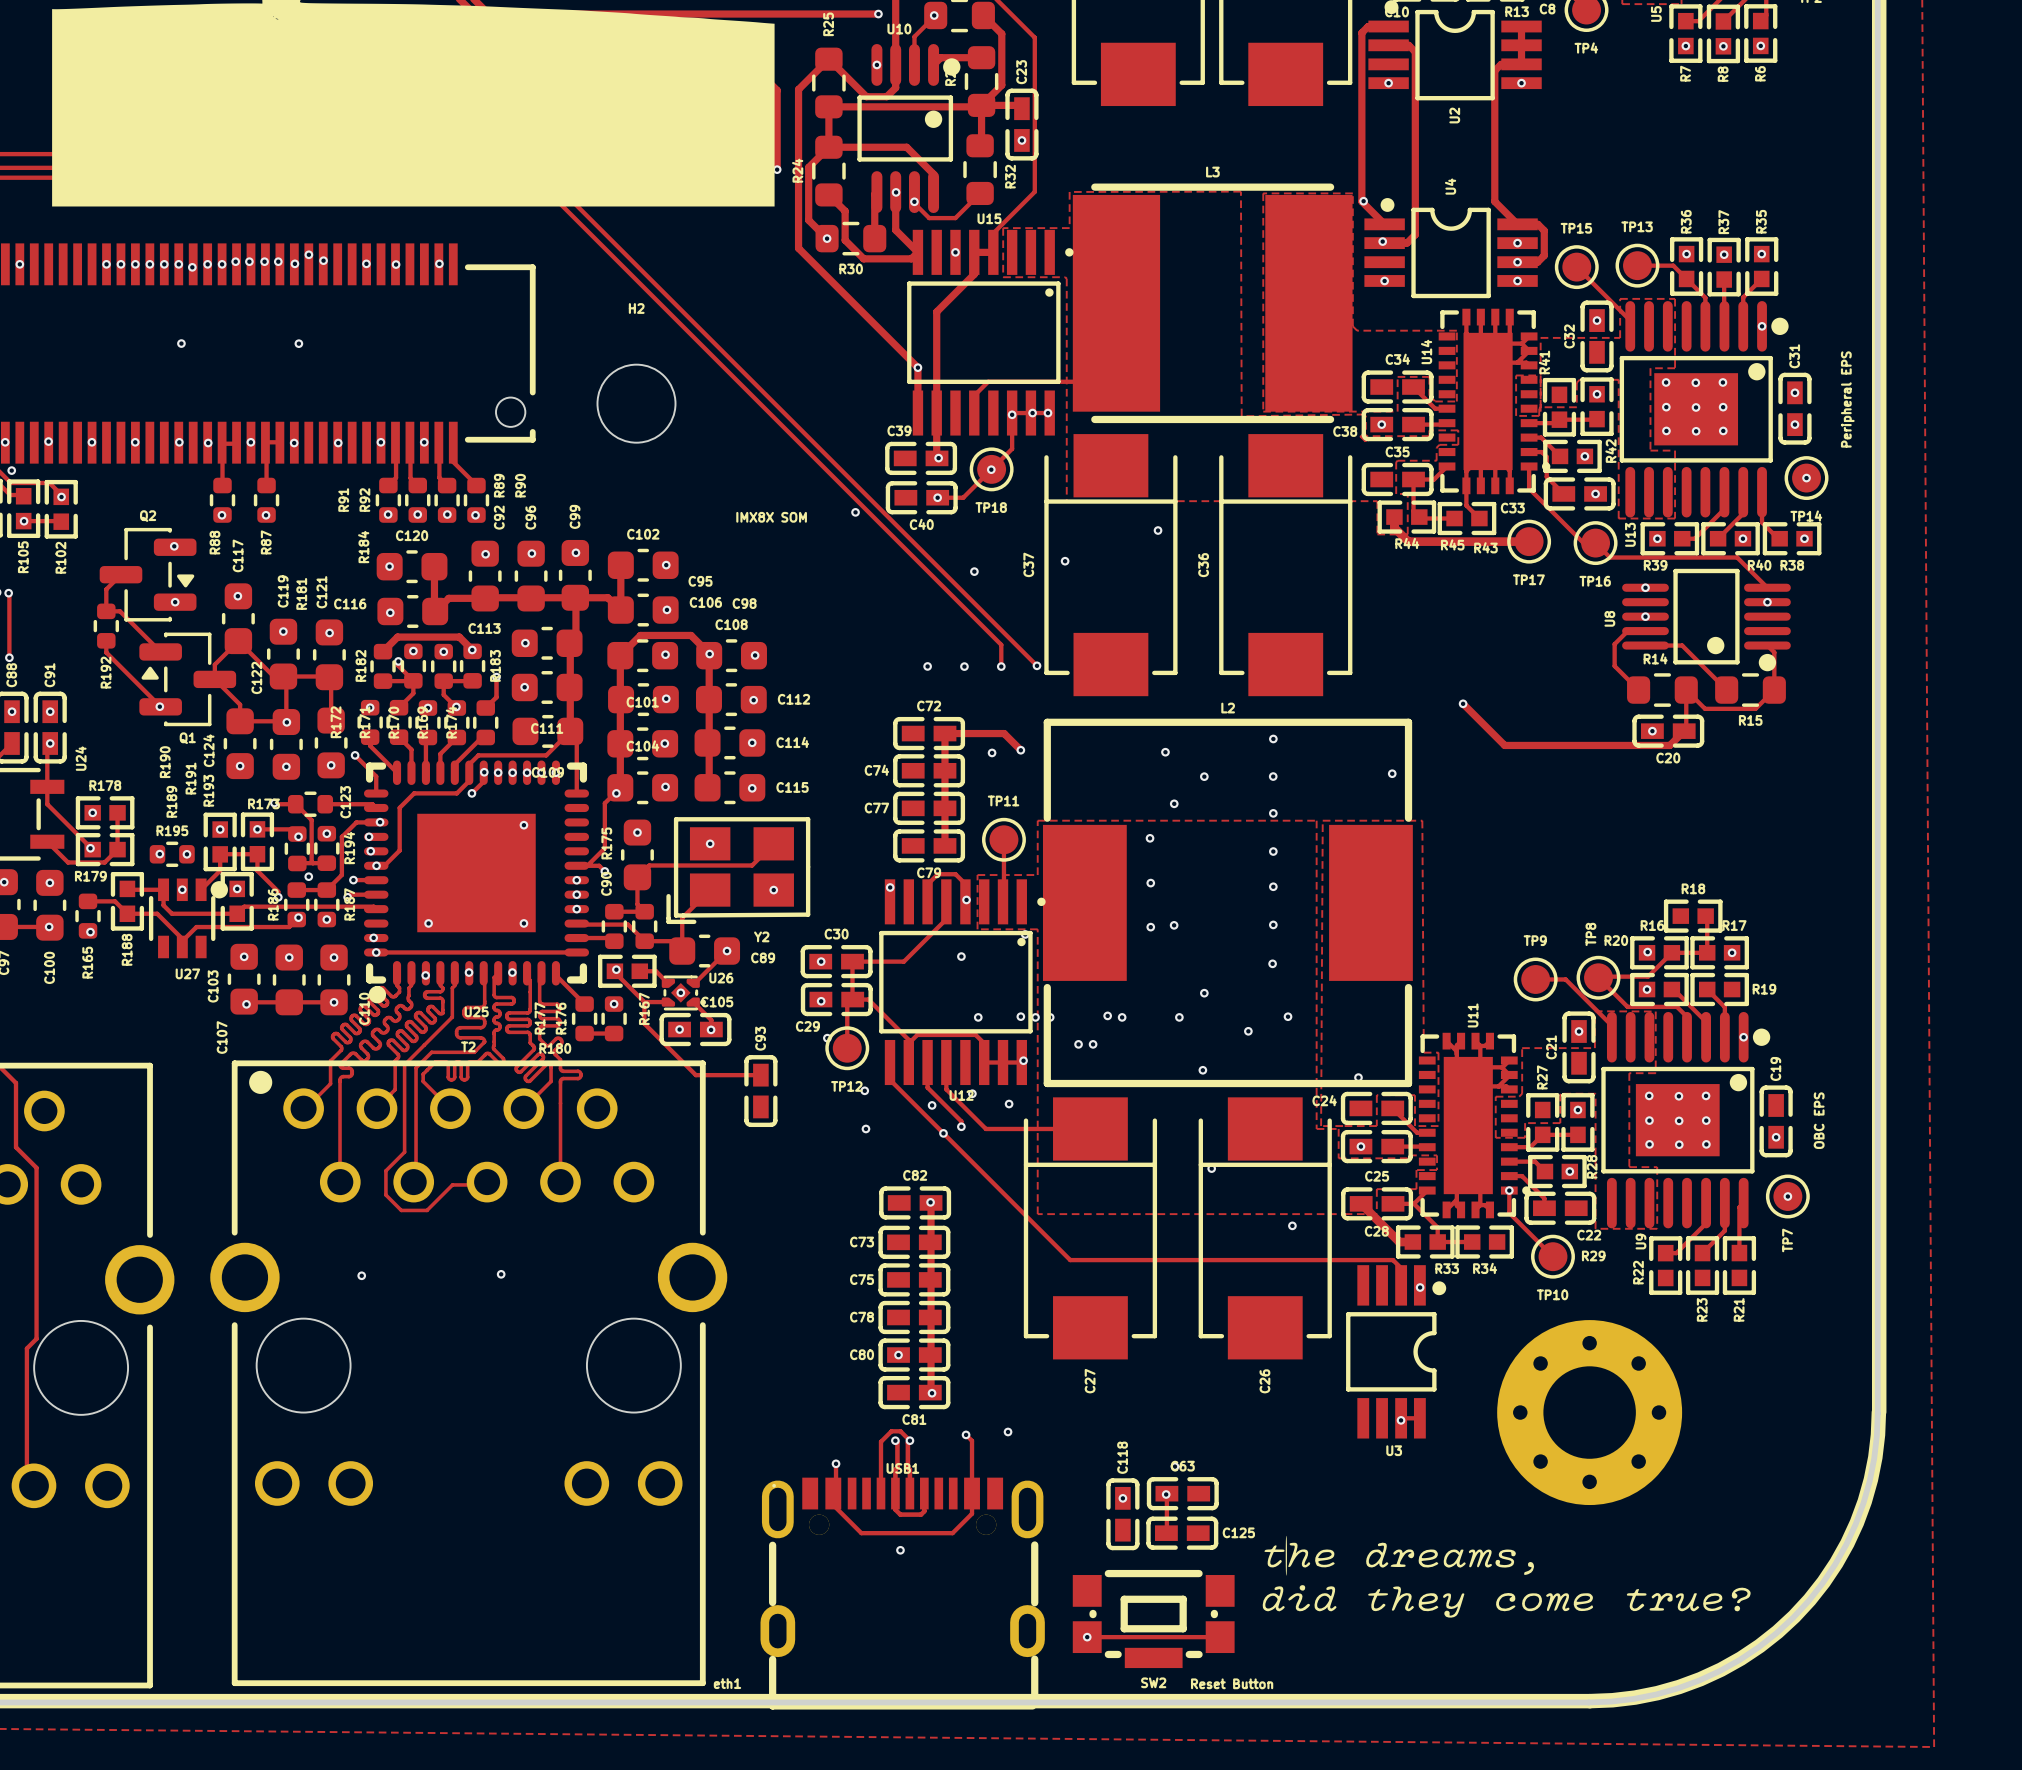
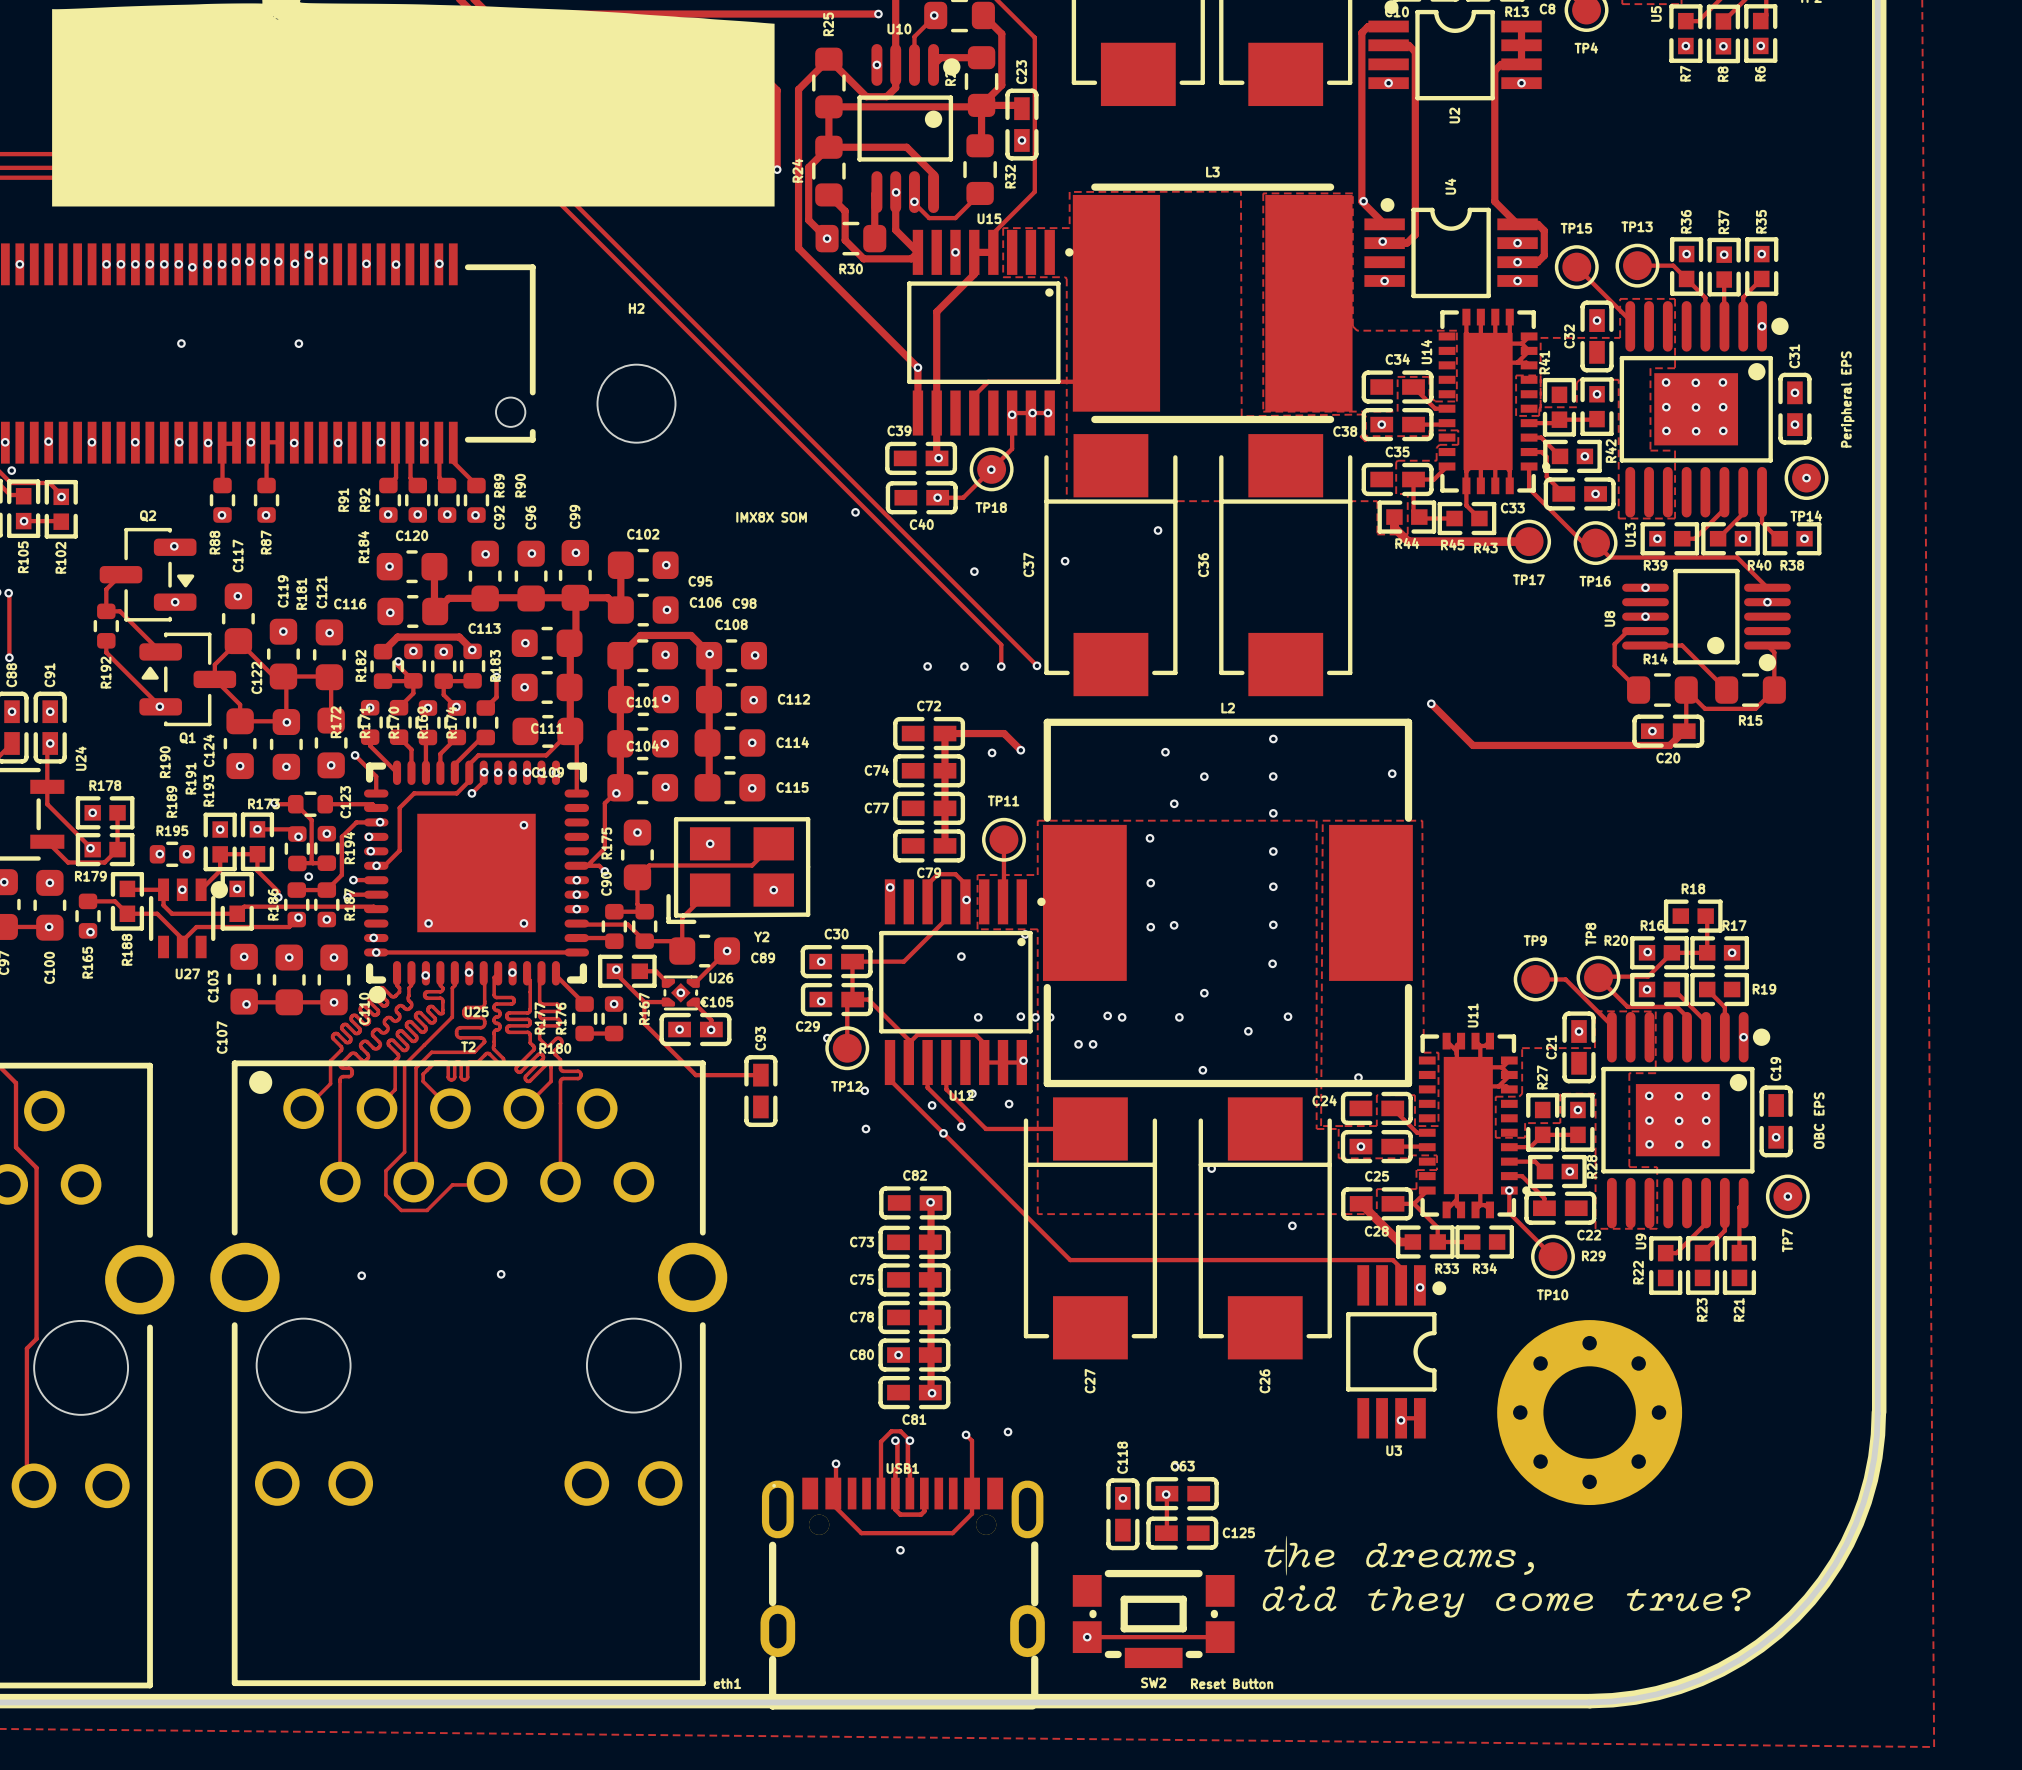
track: (1463, 703) (1504, 745) -> (1431, 703) (1472, 745) (1504, 745)
via position: (1463, 703) -> (1431, 703)

